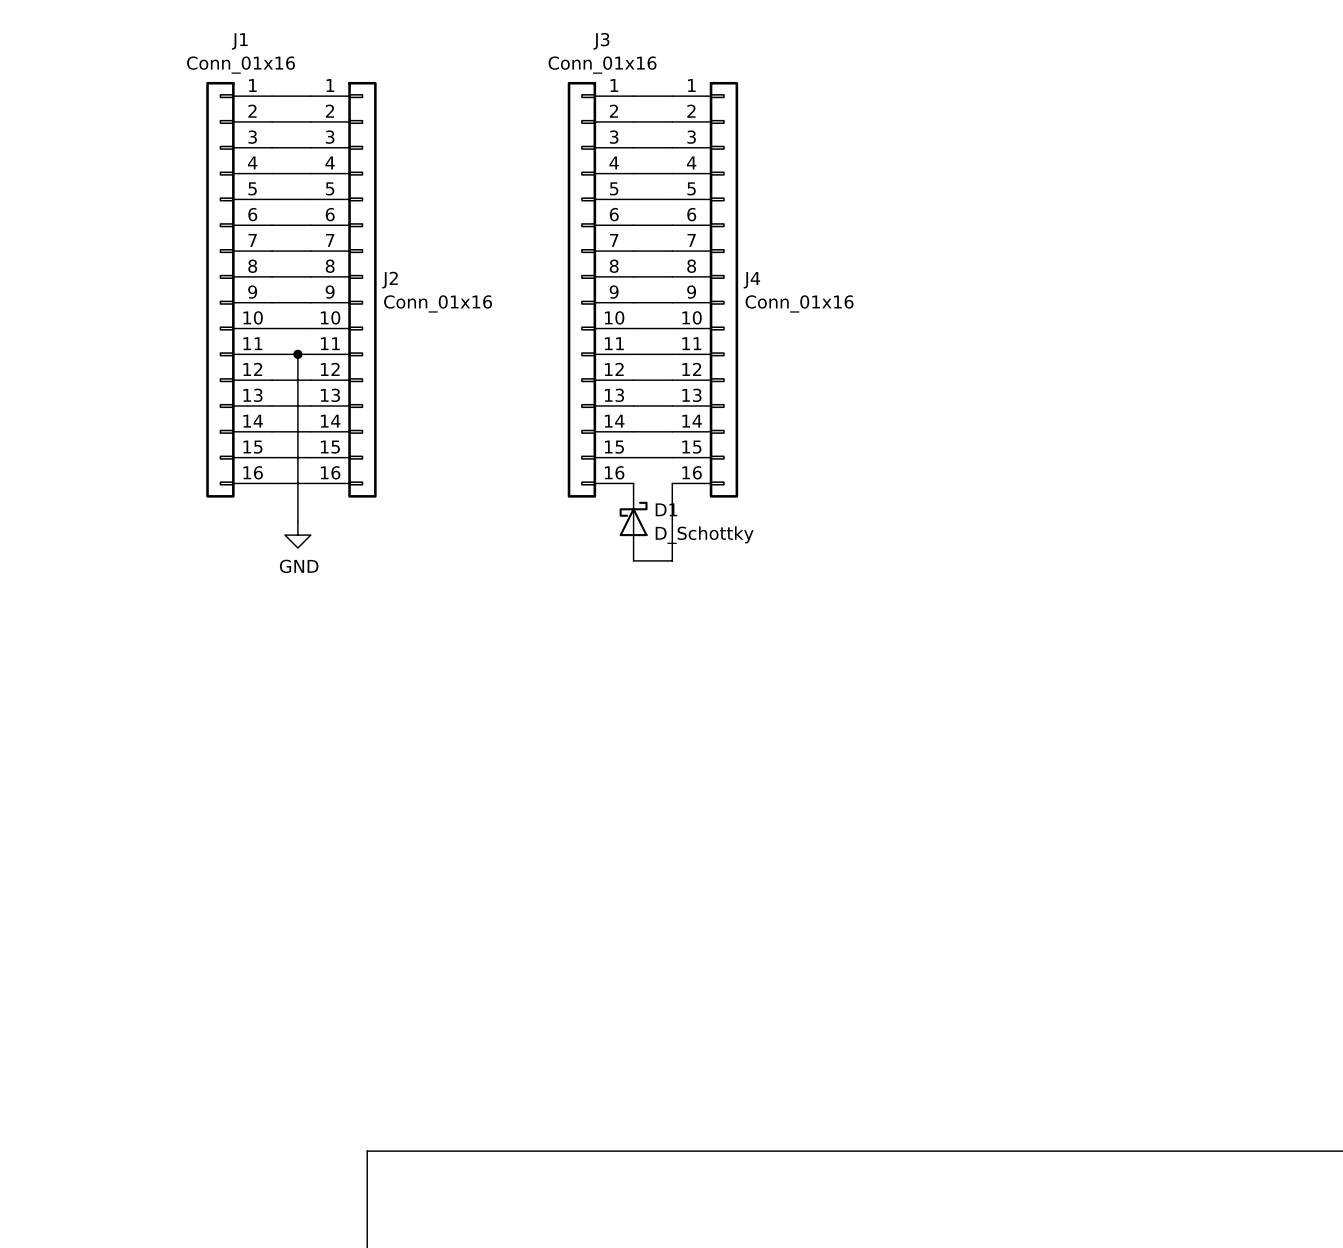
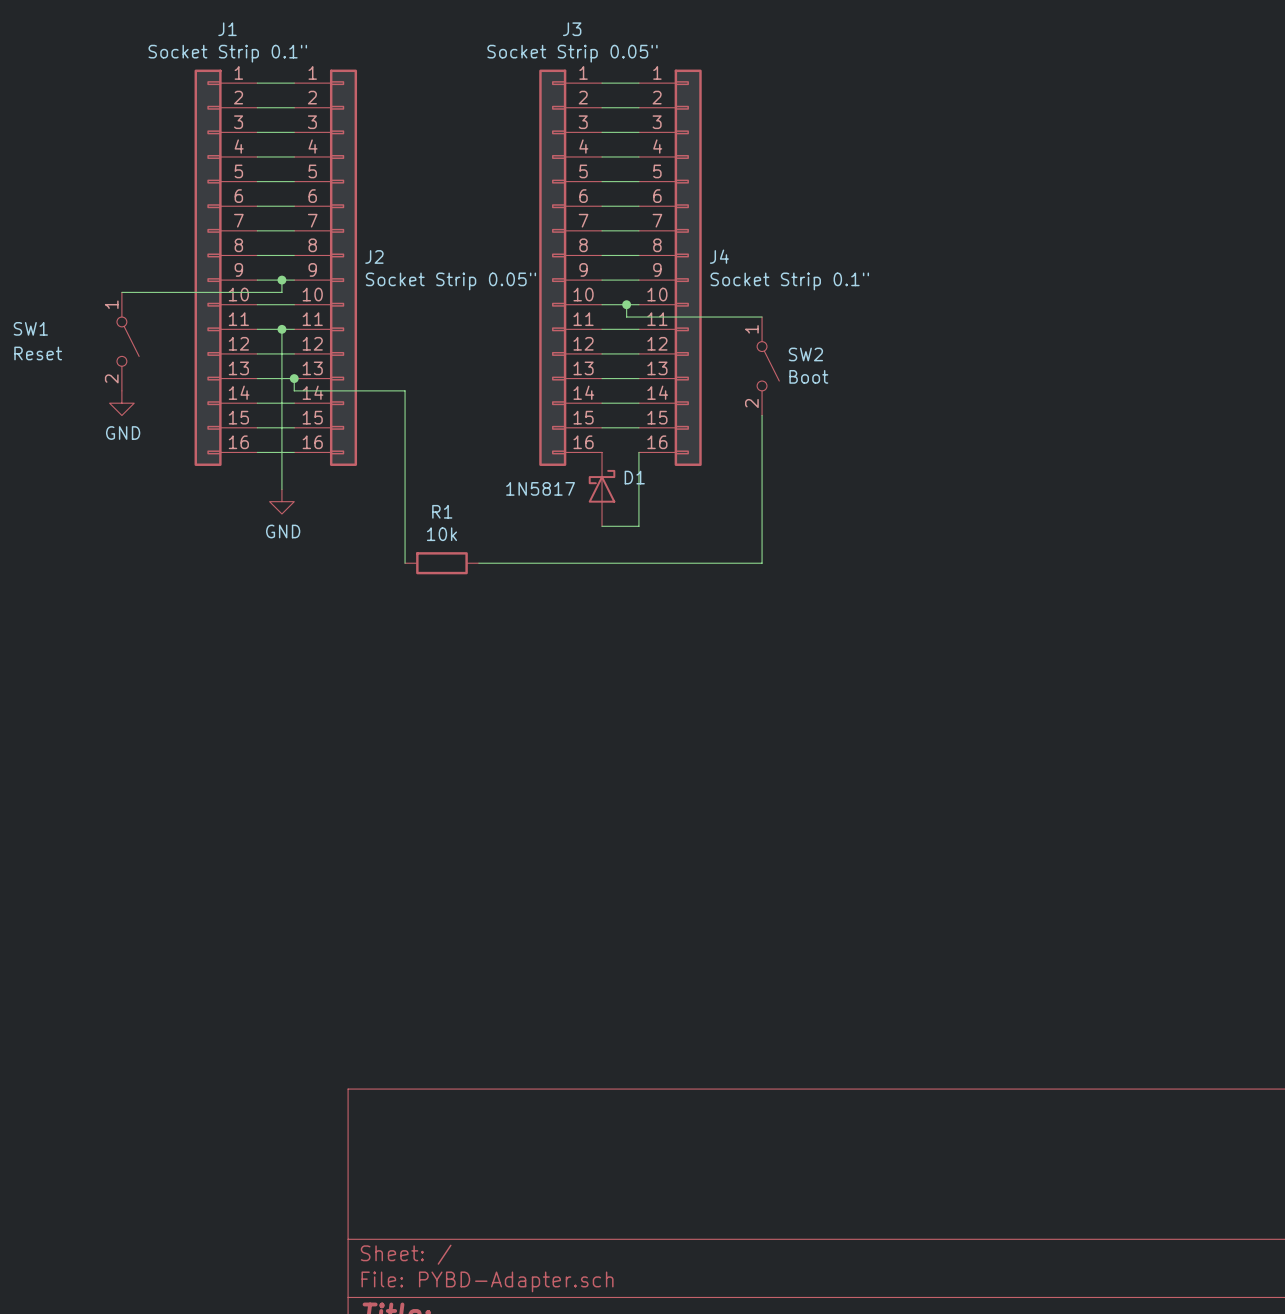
J1 value: Conn_01x16 (241, 65) -> Socket Strip 0.1" (227, 53)
J3 value: Conn_01x16 (602, 65) -> Socket Strip 0.05" (572, 53)
wire: none -> (281, 280) (281, 292) (121, 292)
junction: none -> (281, 280)
J2 value: Conn_01x16 (438, 303) -> Socket Strip 0.05" (450, 281)
J4 value: Conn_01x16 (799, 303) -> Socket Strip 0.1" (789, 281)
wire: none -> (626, 304) (626, 317) (762, 317)
junction: none -> (626, 304)
SW1: none -> Reset (128, 341)
SW2: none -> Boot (768, 366)
wire: none -> (294, 378) (294, 390) (405, 390) (405, 563)
junction: none -> (294, 378)
power symbol: none -> GND (121, 403)
wire: none -> (762, 415) (762, 563) (478, 563)
D1 value: D_Schottky (704, 535) -> 1N5817 (540, 488)
R1: none -> 10k (441, 563)

